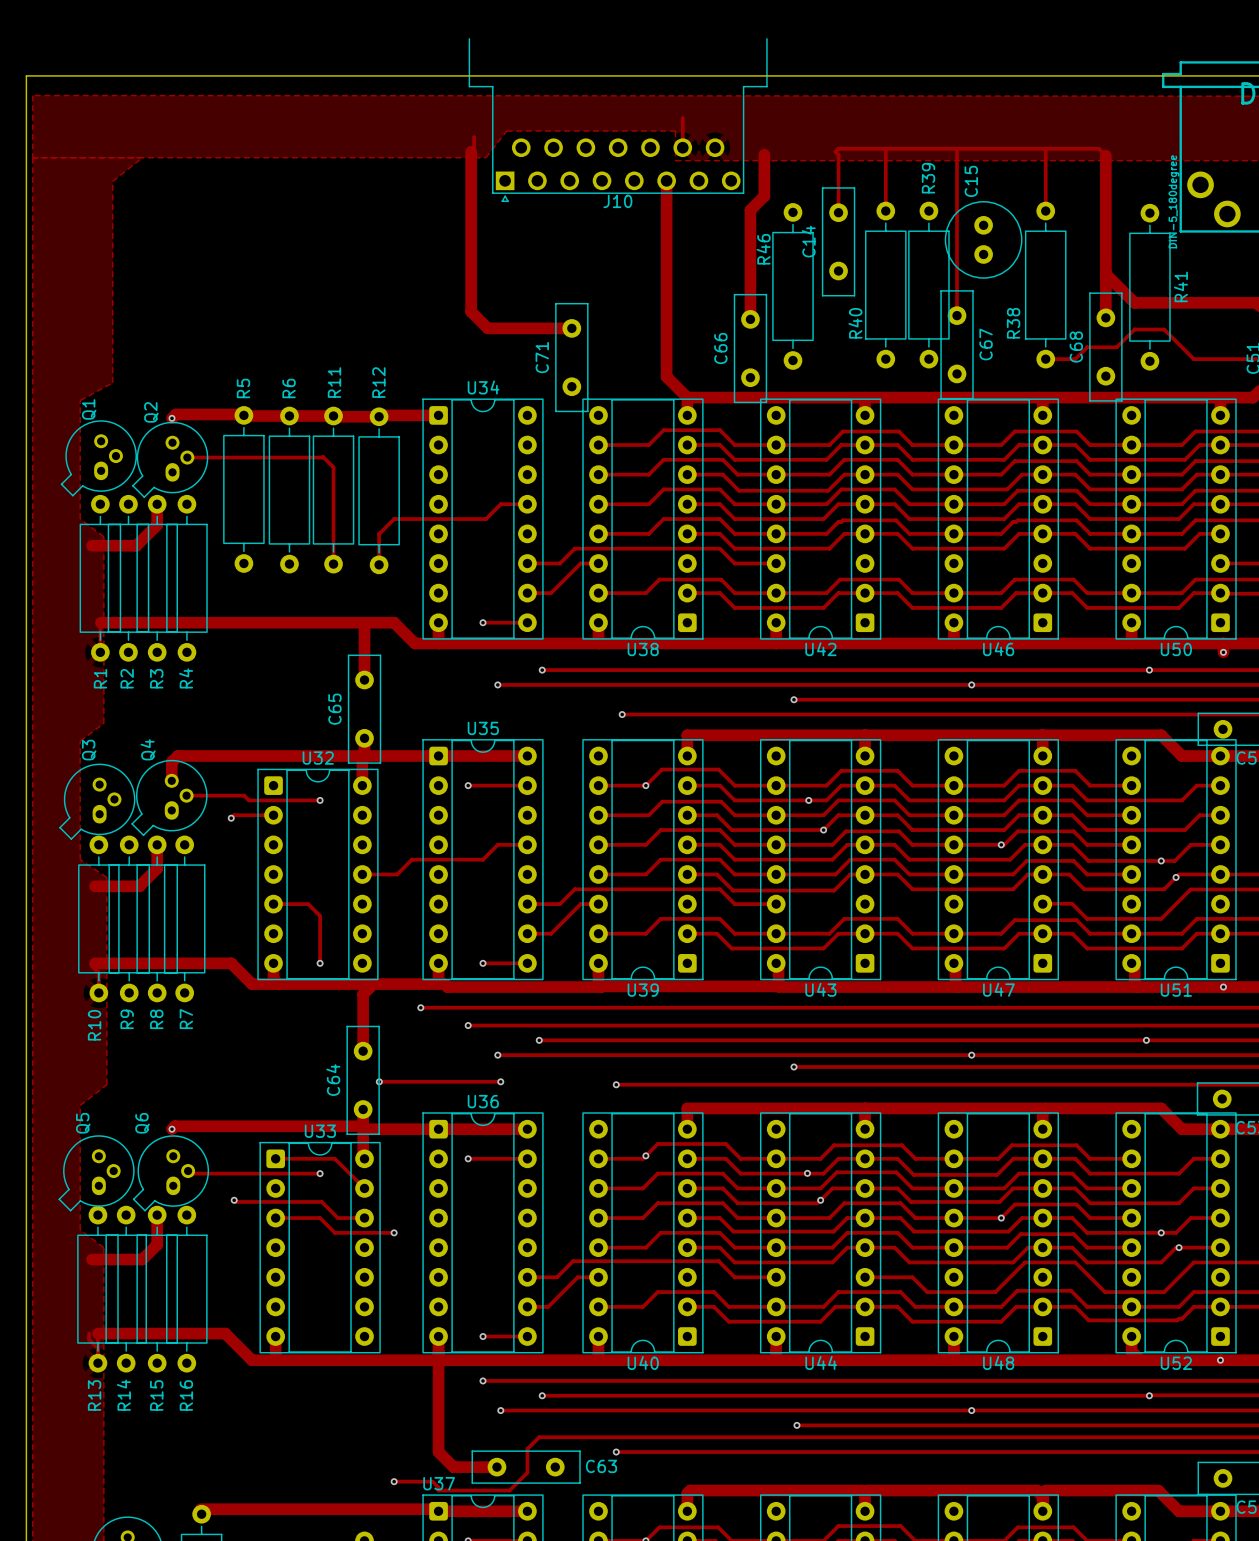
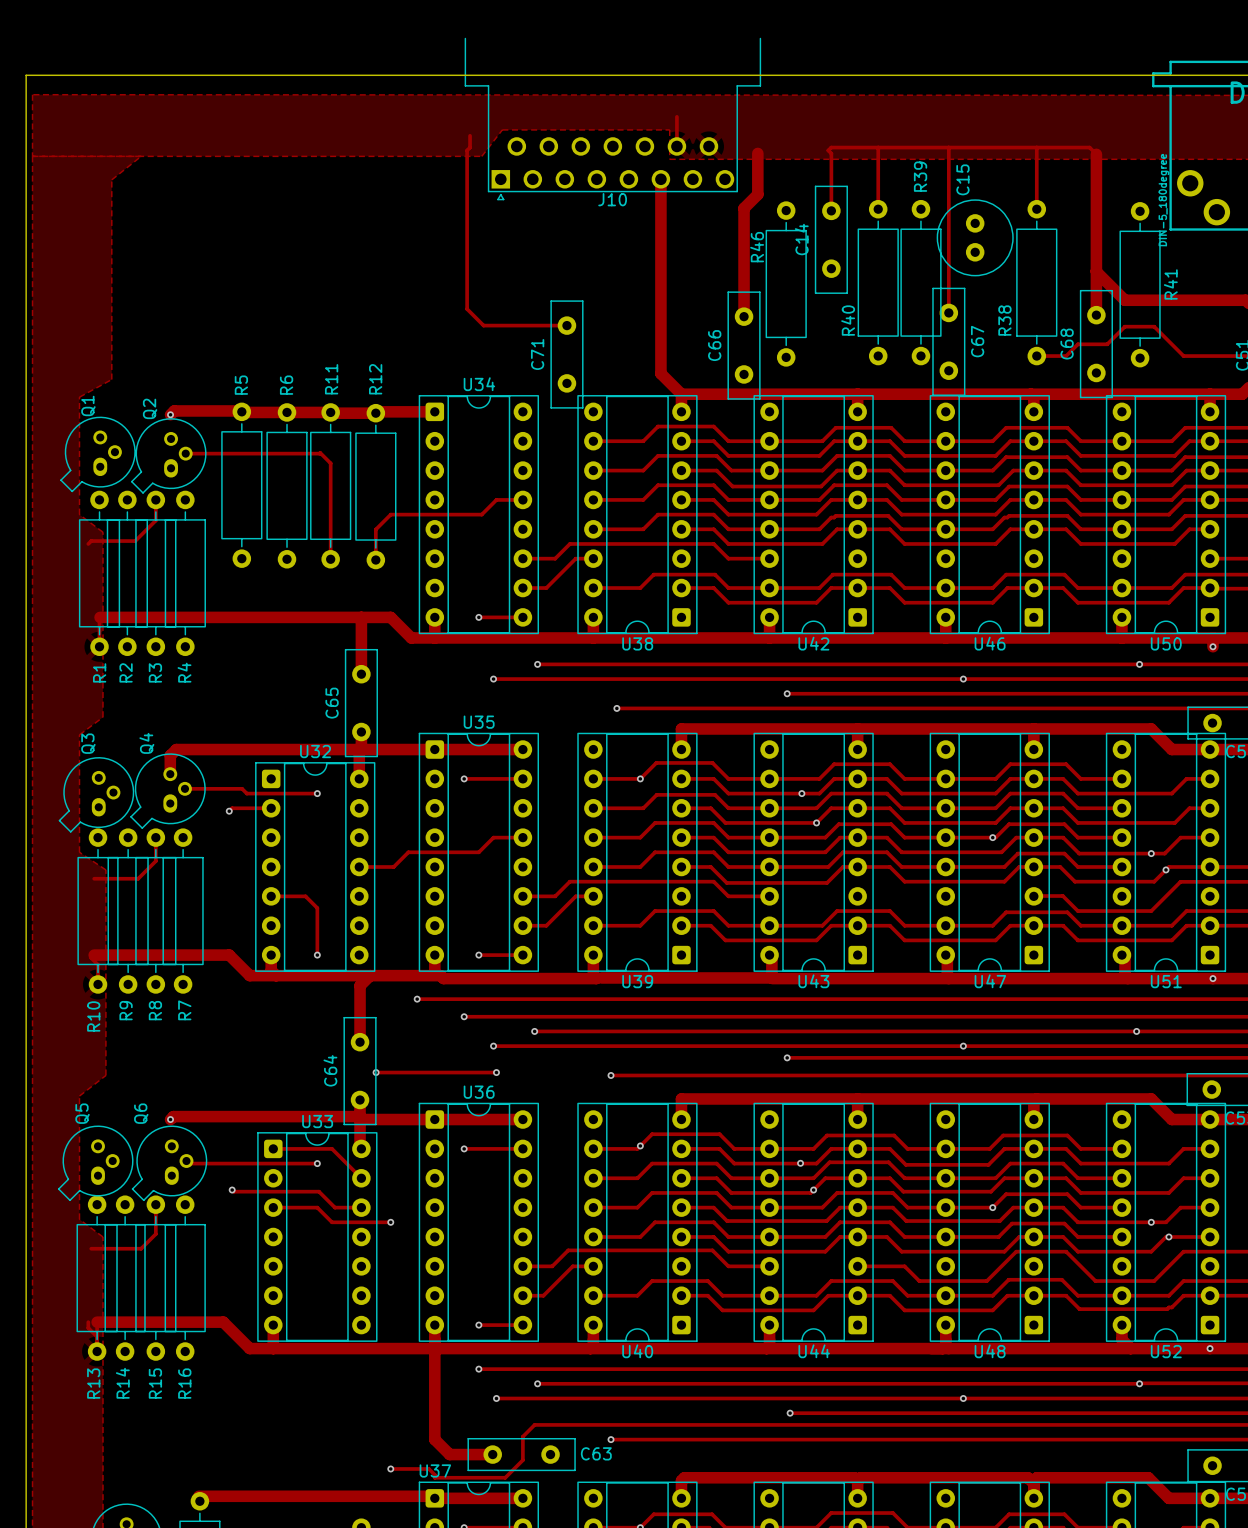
track width: thick (471, 151) (471, 311) (487, 328) (575, 328) -> thin (467, 150) (467, 309) (483, 325) (570, 325)
track width: thick (157, 504) (157, 524) (136, 545) (92, 545) -> thin (155, 499) (155, 520) (135, 541) (91, 541)
track width: thick (157, 844) (157, 868) (139, 886) (94, 886) -> thin (155, 837) (155, 861) (138, 878) (94, 878)
track width: thick (157, 1215) (157, 1244) (142, 1259) (92, 1259) -> thin (155, 1204) (155, 1234) (141, 1248) (91, 1248)

